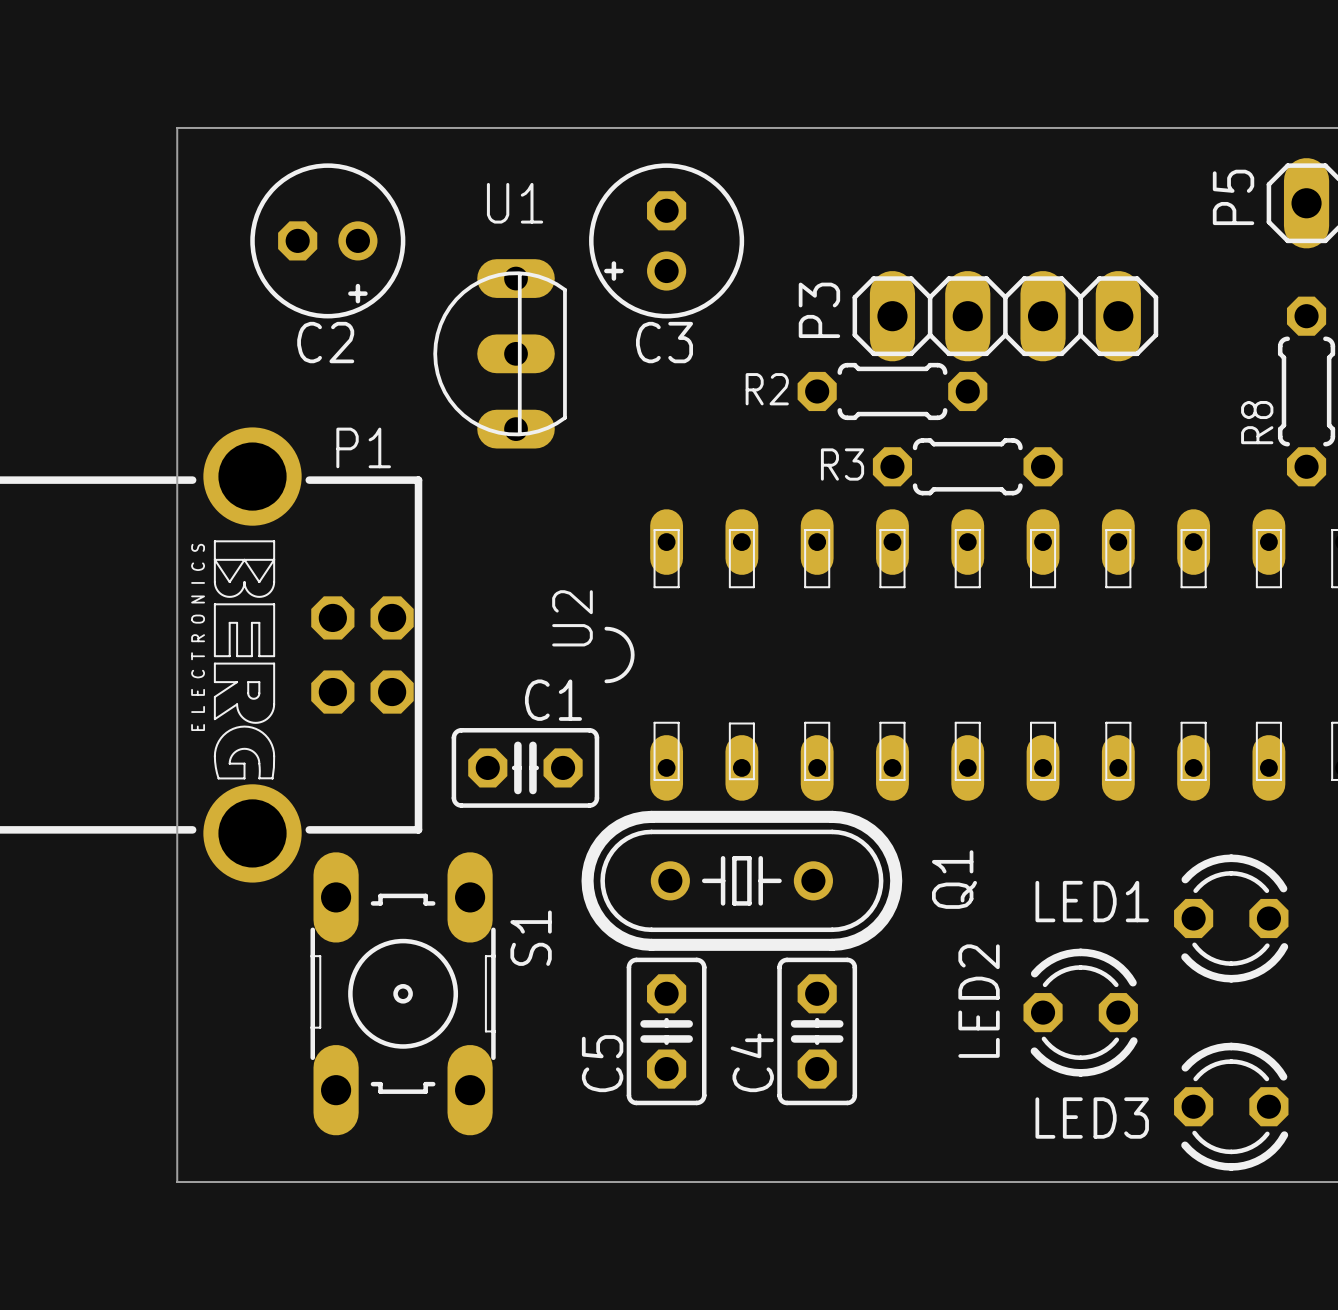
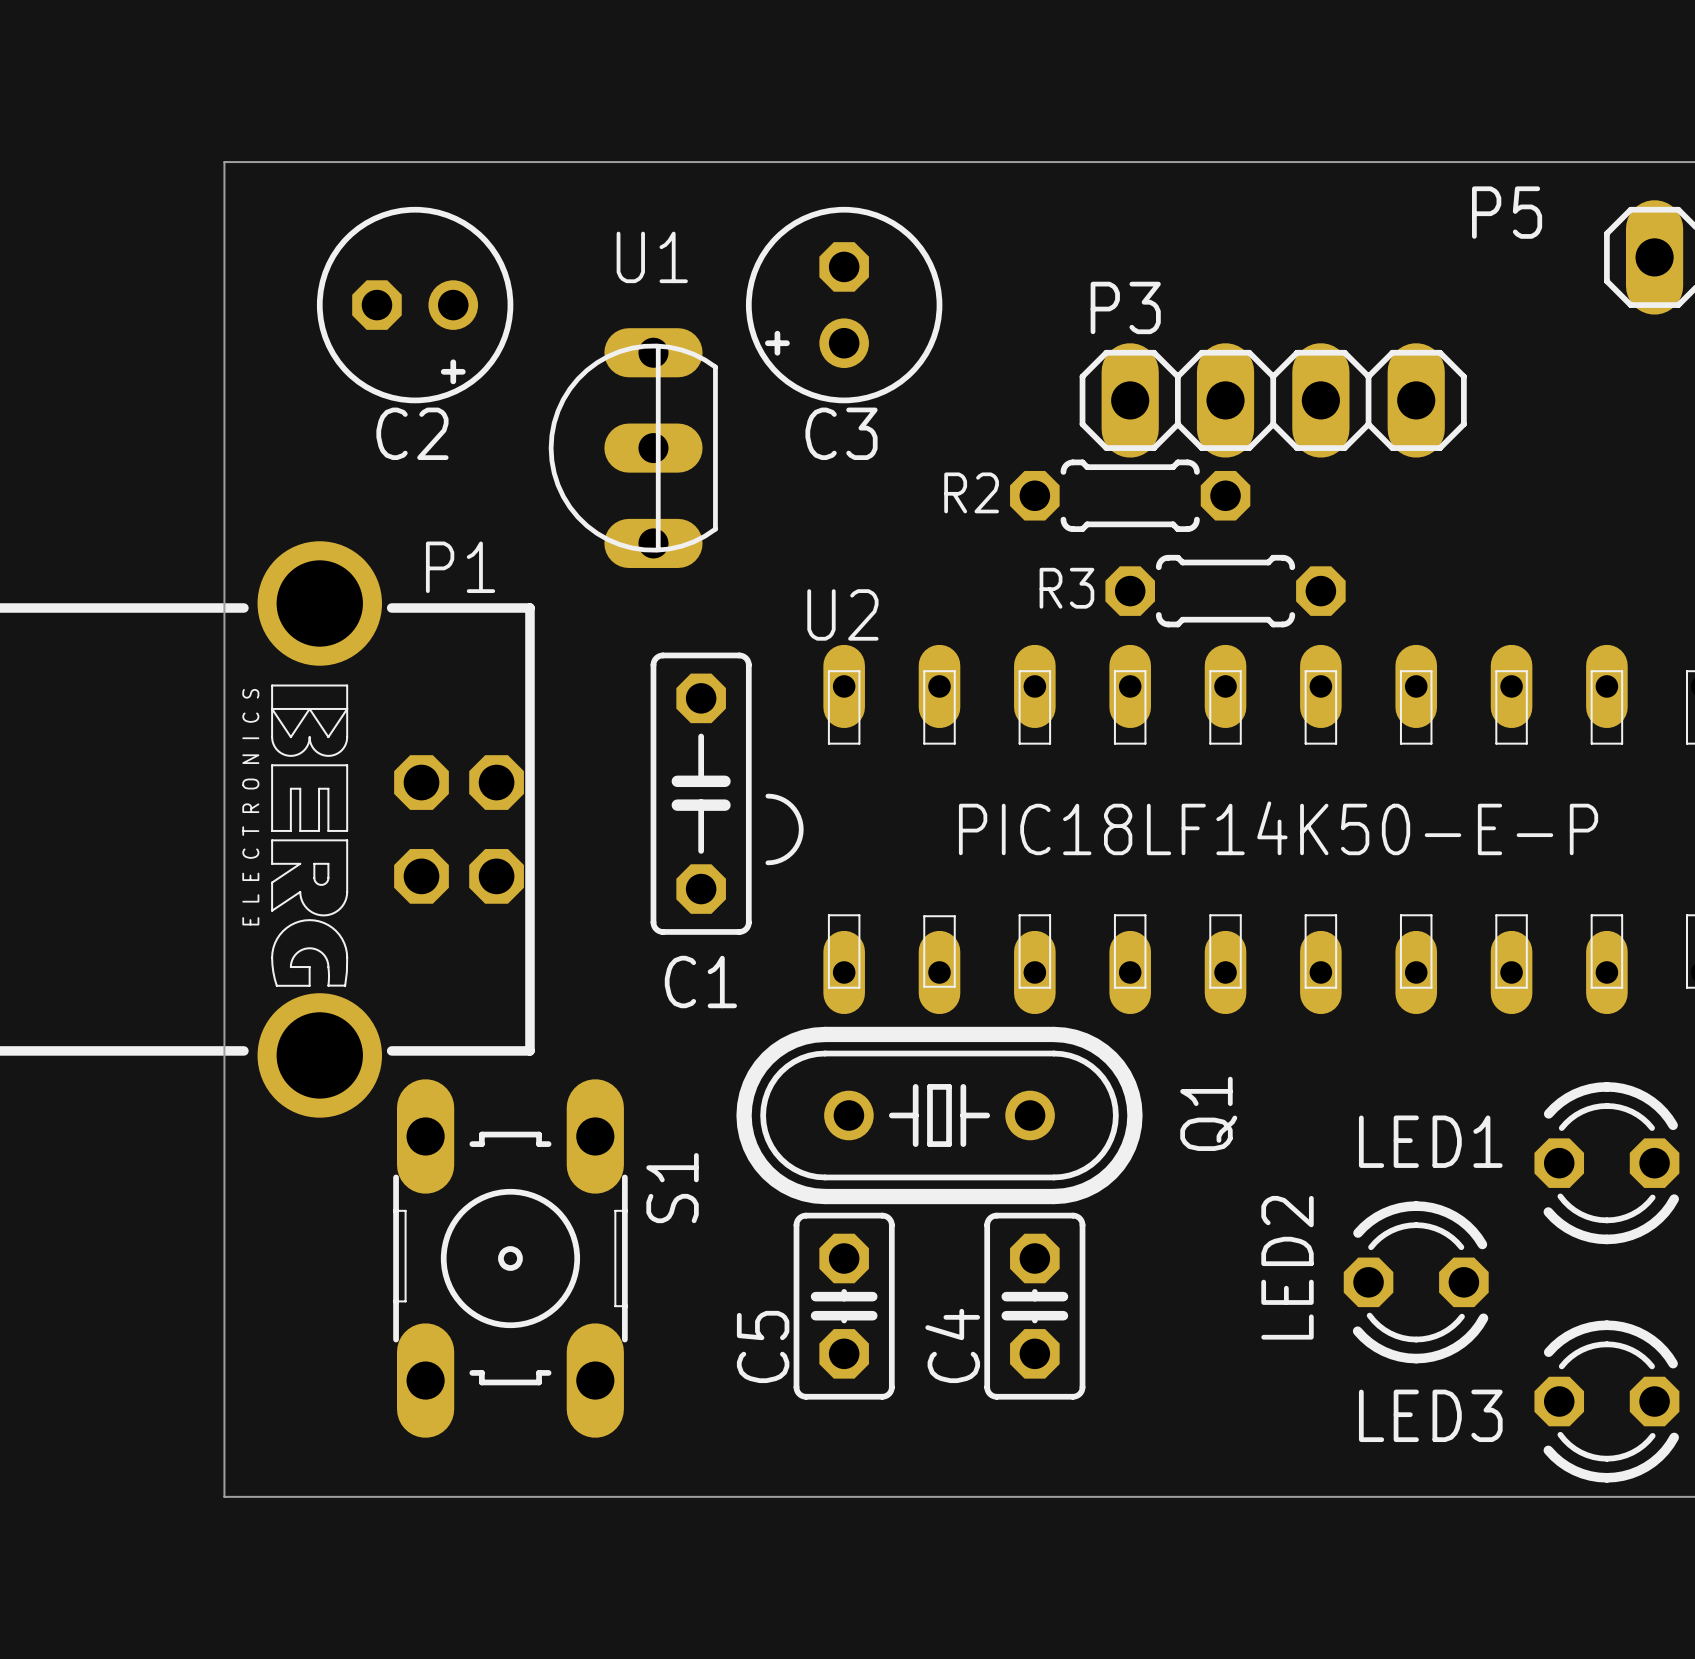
P5 name rotation: 0° (1233, 197) -> 90° clockwise (1507, 212)
P3 name rotation: 0° (819, 310) -> 90° clockwise (1125, 307)
P3 name position: P3 (819, 310) -> P3 (1125, 307)
R8: (1306, 391) -> none
U2 name rotation: 0° (572, 618) -> 90° clockwise (842, 614)
U2 name position: U2 (572, 618) -> U2 (842, 614)
U2 value: none -> PIC18LF14K50-E-P (1278, 828)
C1 name position: C1 (553, 700) -> C1 (700, 982)
C1 footprint: [451, 728, 600, 808] -> [650, 652, 752, 935]
LED1 position: (1231, 918) -> (1606, 1163)
LED2 position: (1080, 1012) -> (1416, 1282)
LED3 position: (1231, 1106) -> (1606, 1401)

